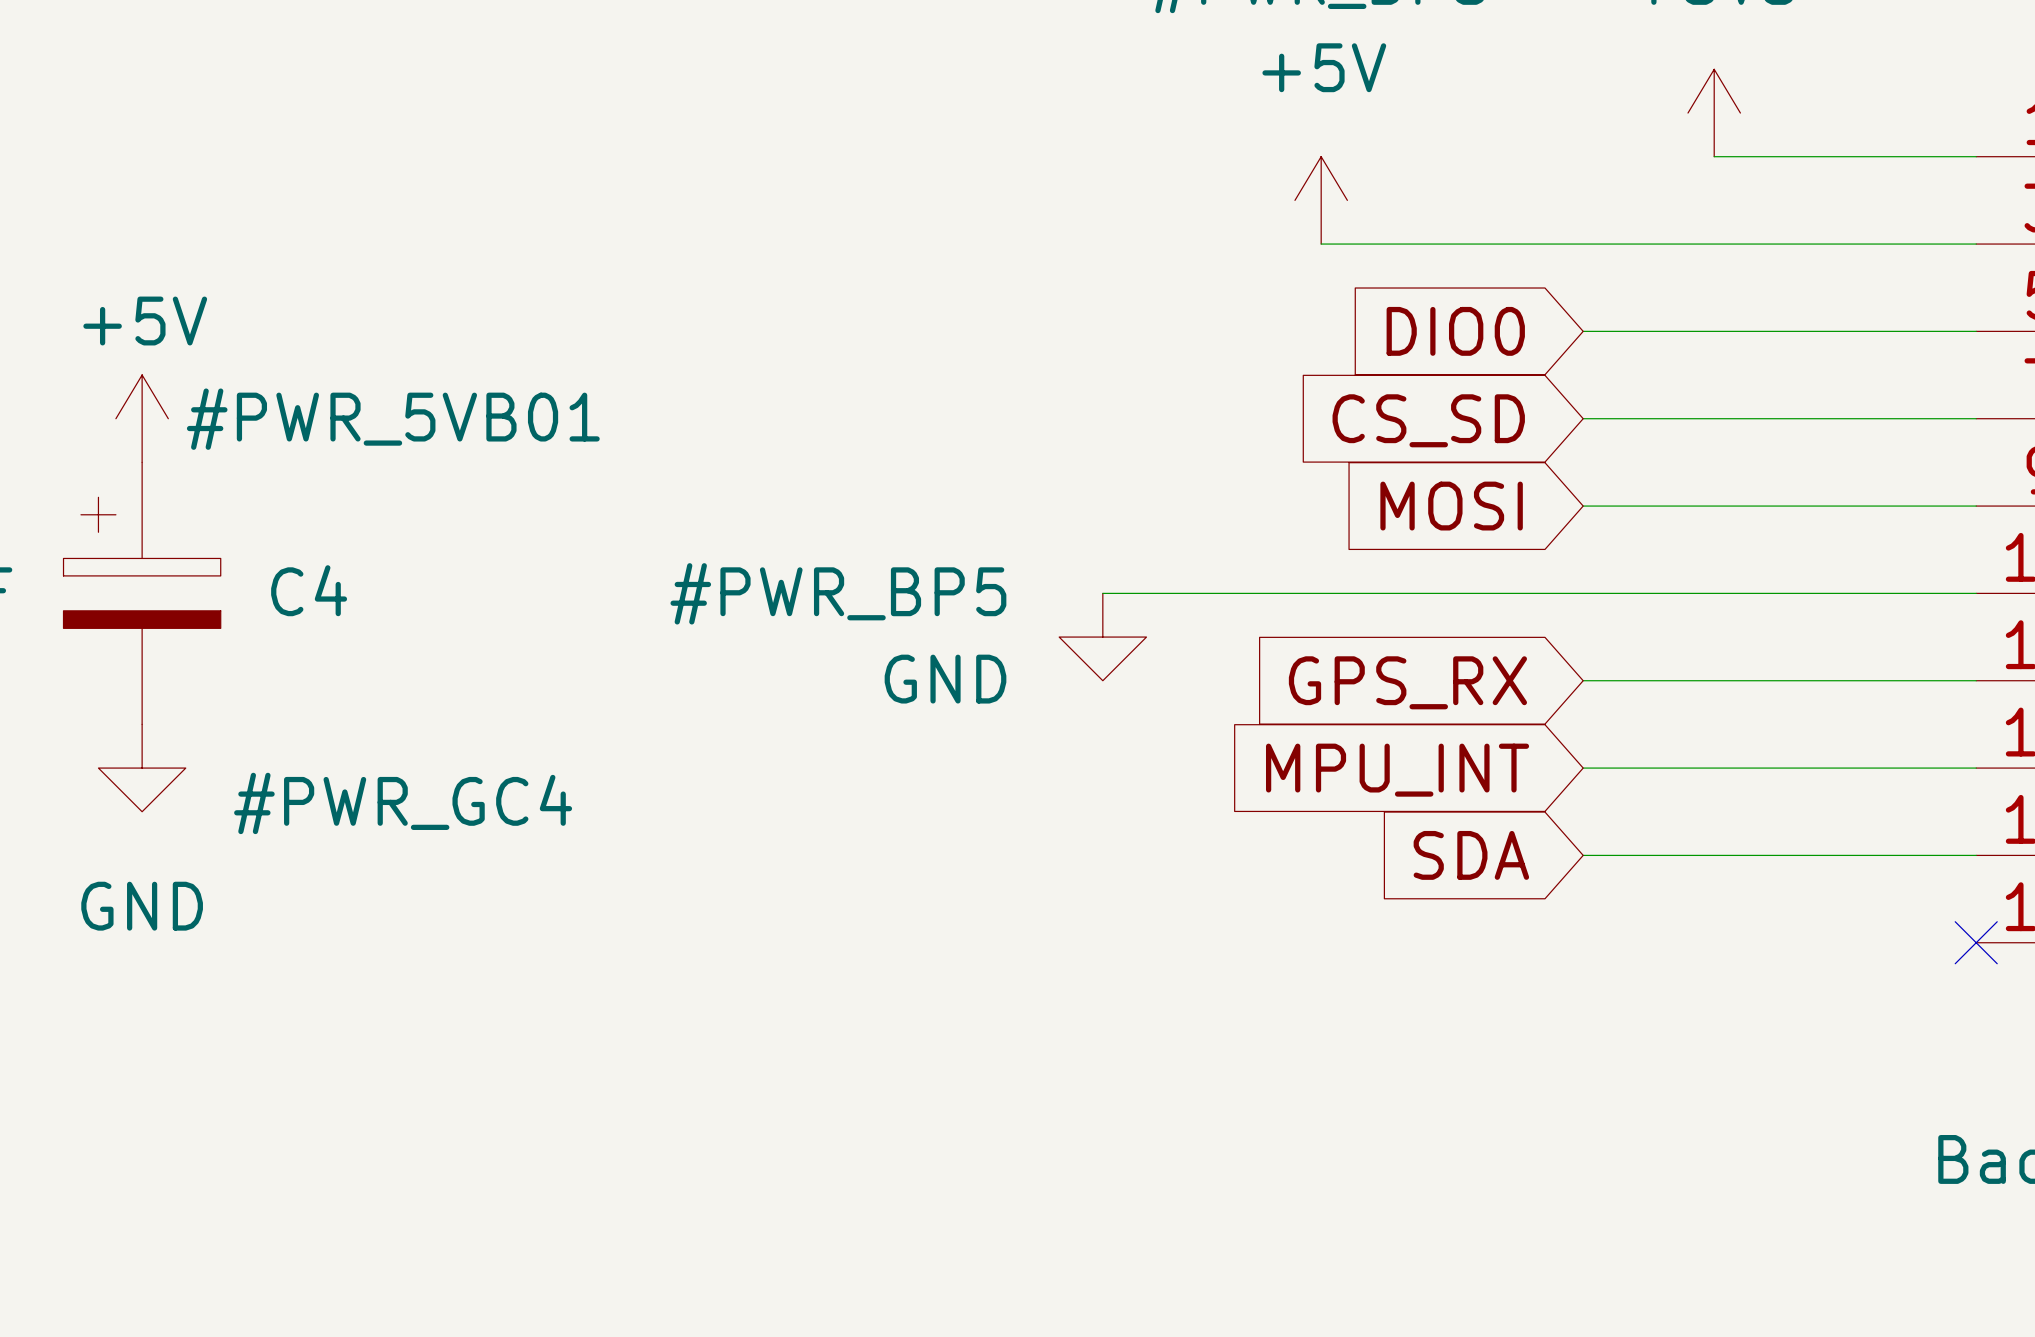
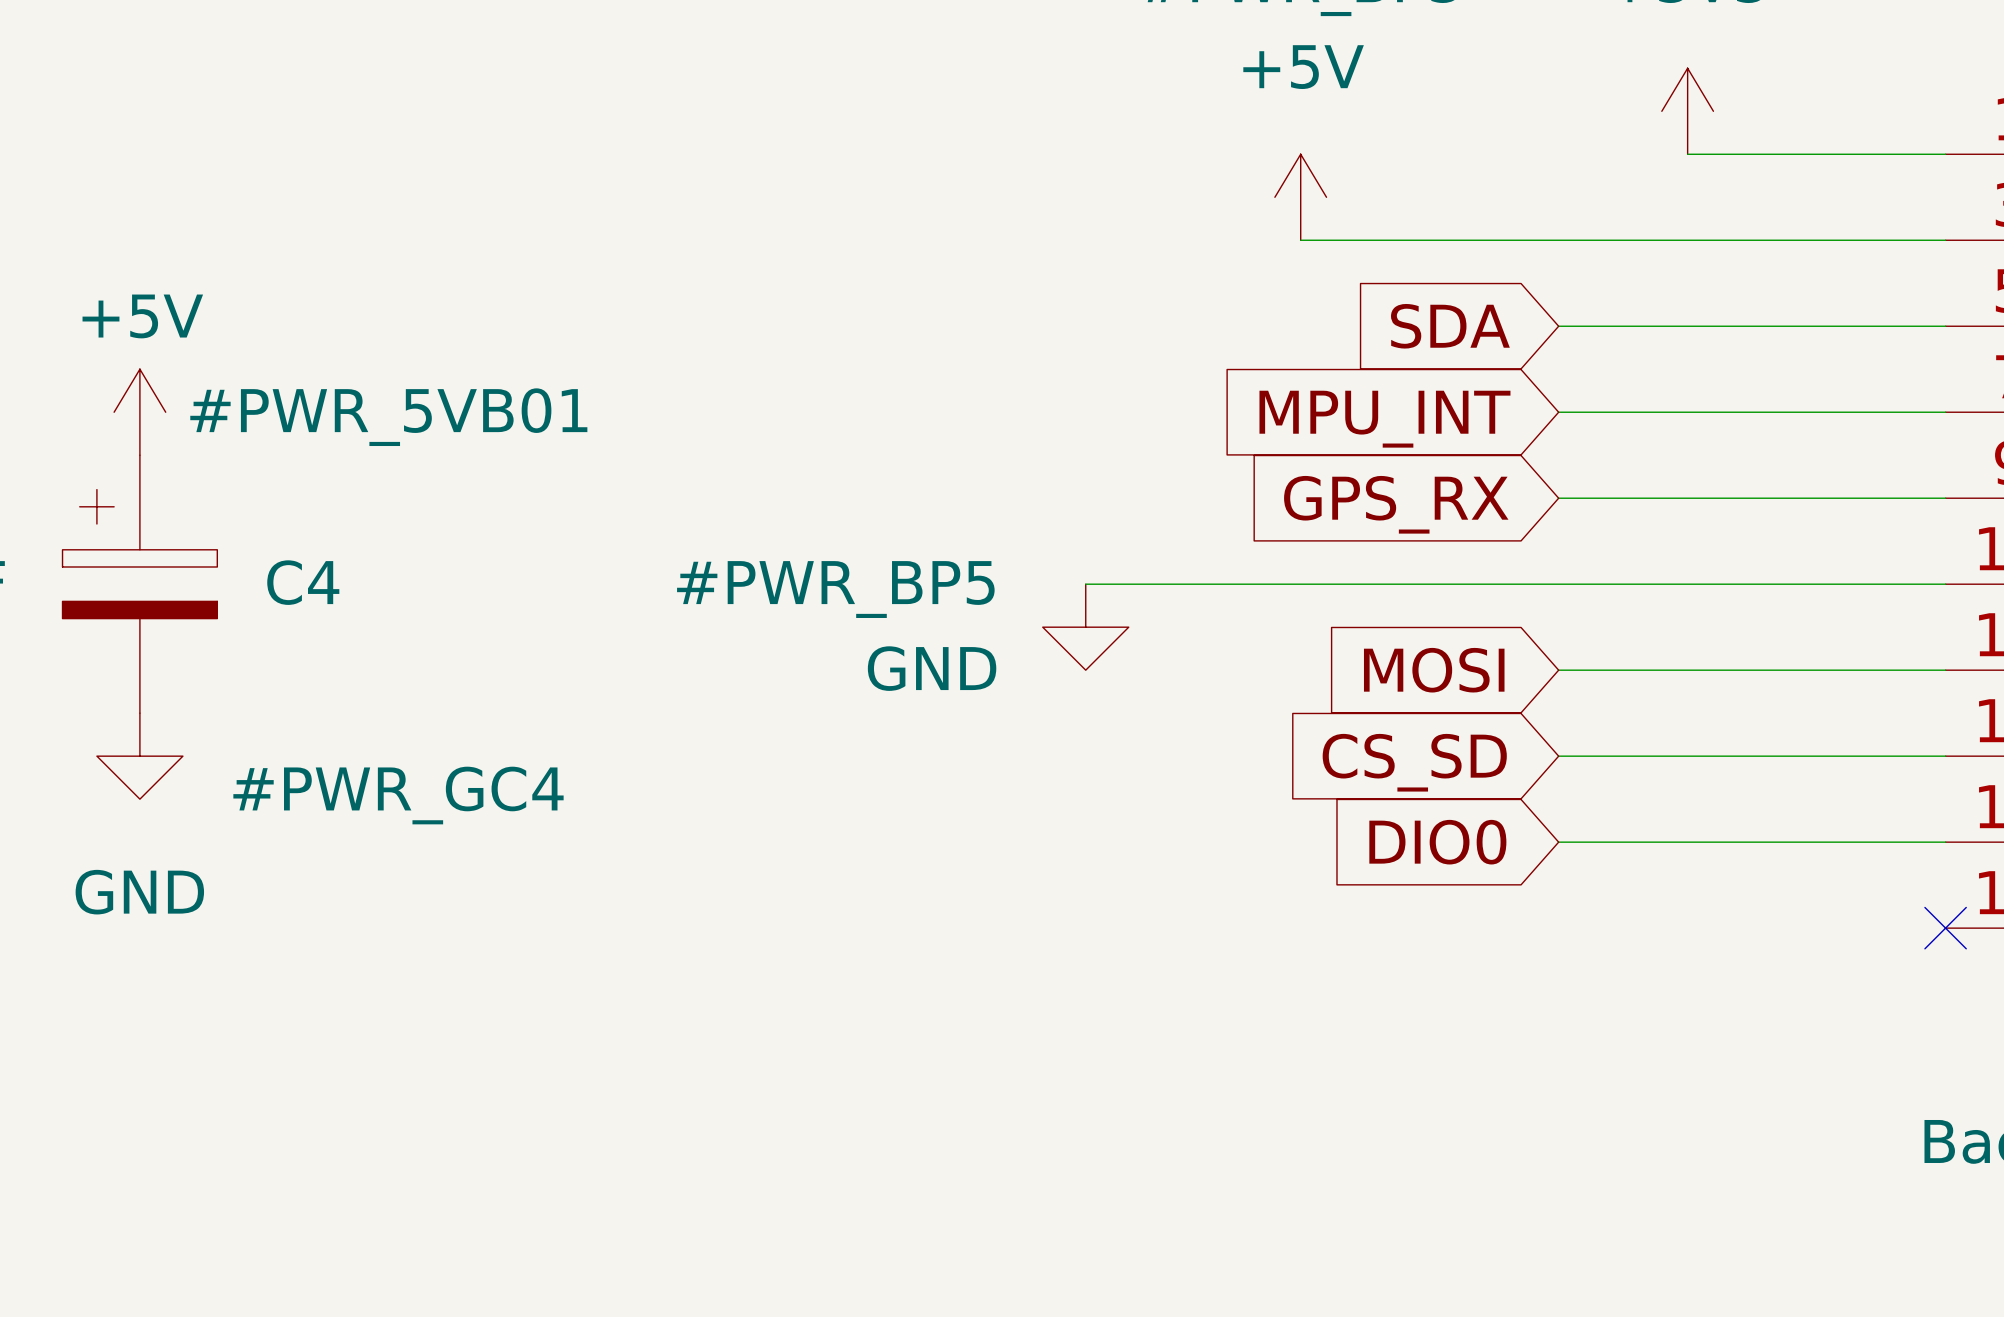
global label: DIO0 (1455, 331) -> SDA (1450, 326)
global label: CS_SD (1428, 420) -> MPU_INT (1384, 419)
global label: MOSI (1451, 506) -> GPS_RX (1396, 504)
global label: GPS_RX (1407, 682) -> MOSI (1434, 670)
global label: MPU_INT (1397, 770) -> CS_SD (1414, 762)
global label: SDA (1471, 855) -> DIO0 (1437, 842)

